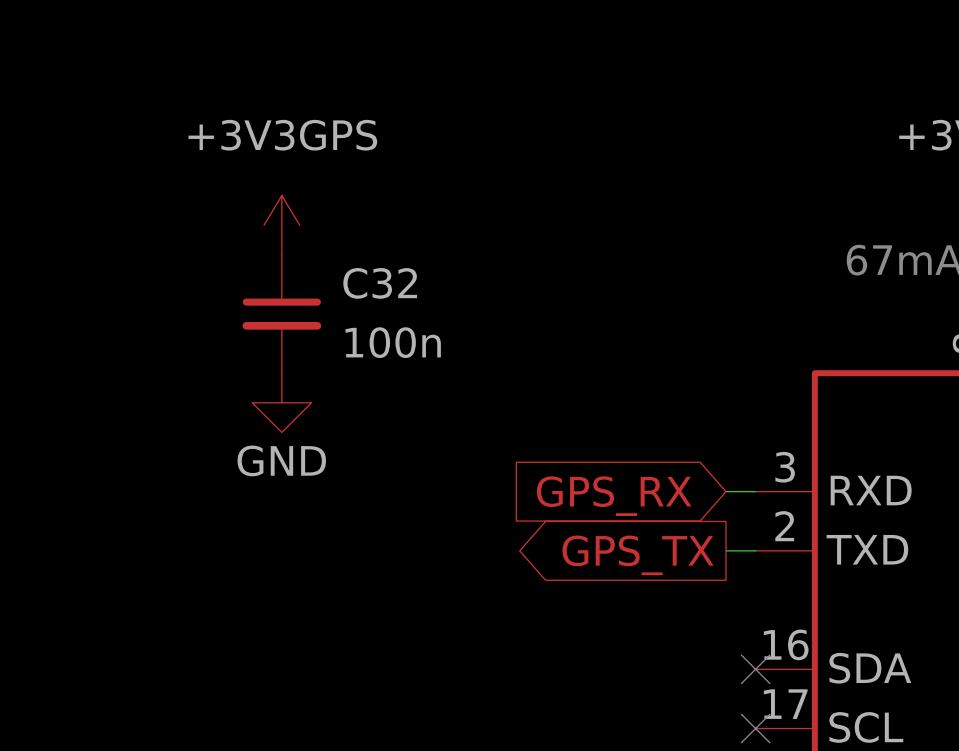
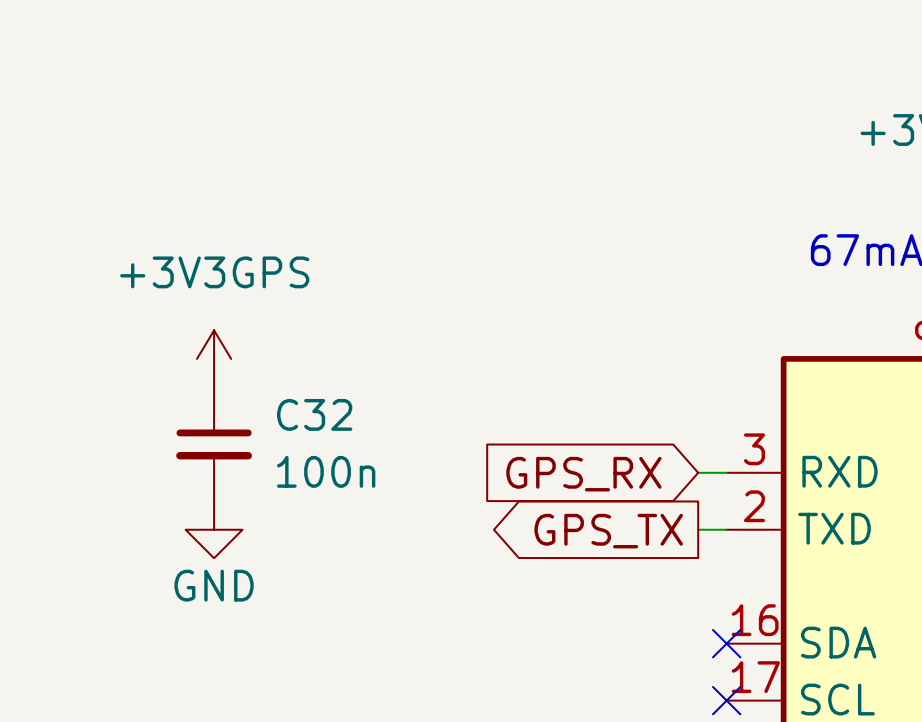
power symbol position: +3V3GPS (281, 225) -> +3V3GPS (214, 358)
C32 position: (281, 313) -> (214, 444)
power symbol position: GND (281, 402) -> GND (214, 529)

